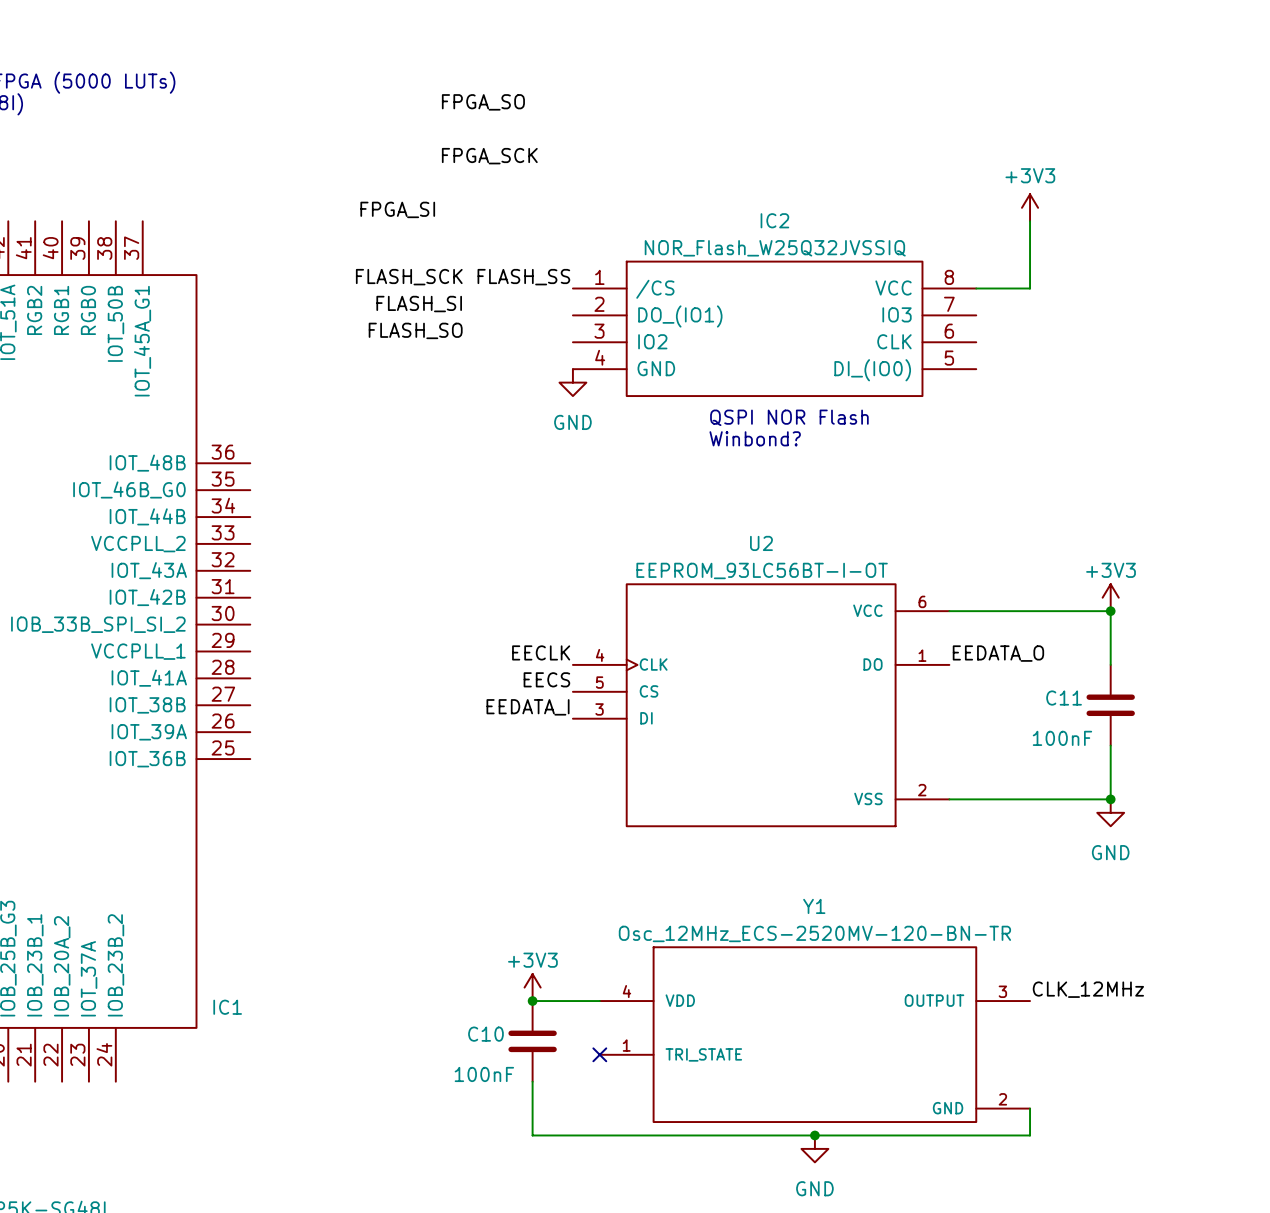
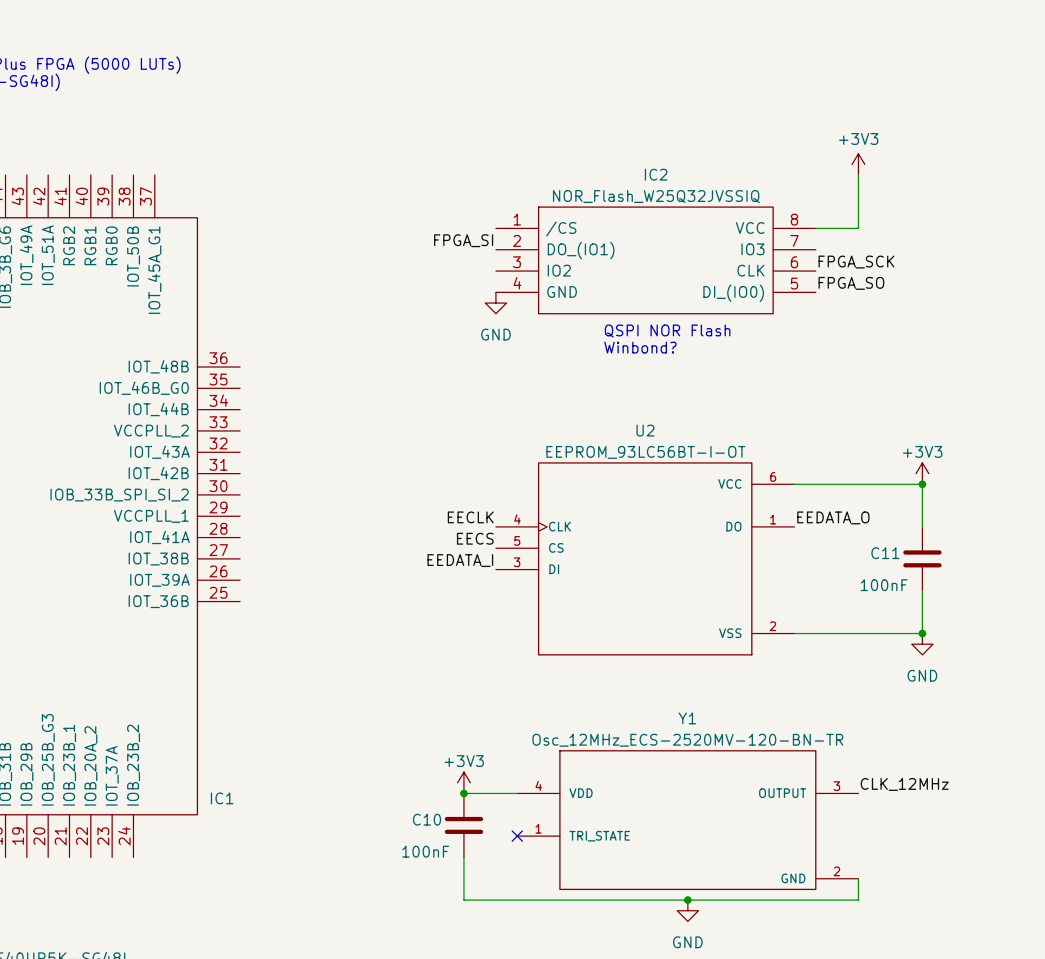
label: FPGA_SO (483, 102) -> none
label: FPGA_SCK (489, 156) -> none
label position: FPGA_SI (397, 209) -> FPGA_SI (463, 240)
label: FLASH_SCK (409, 277) -> none
label: FLASH_SS (523, 277) -> none
label: FLASH_SI (419, 304) -> none
label: FLASH_SO (415, 330) -> none
label: none -> FPGA_SCK (856, 262)
label: none -> FPGA_SO (851, 283)

